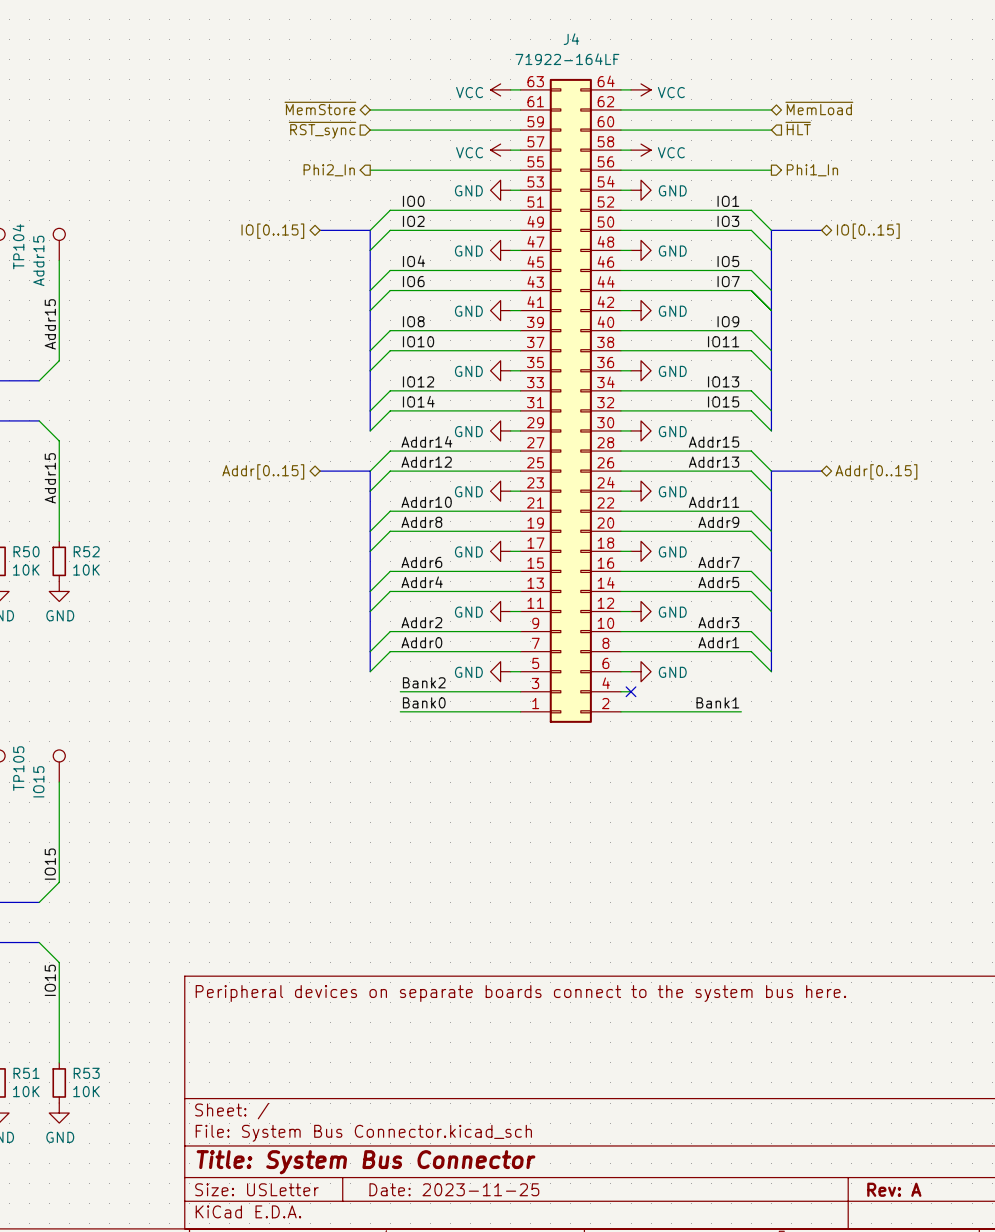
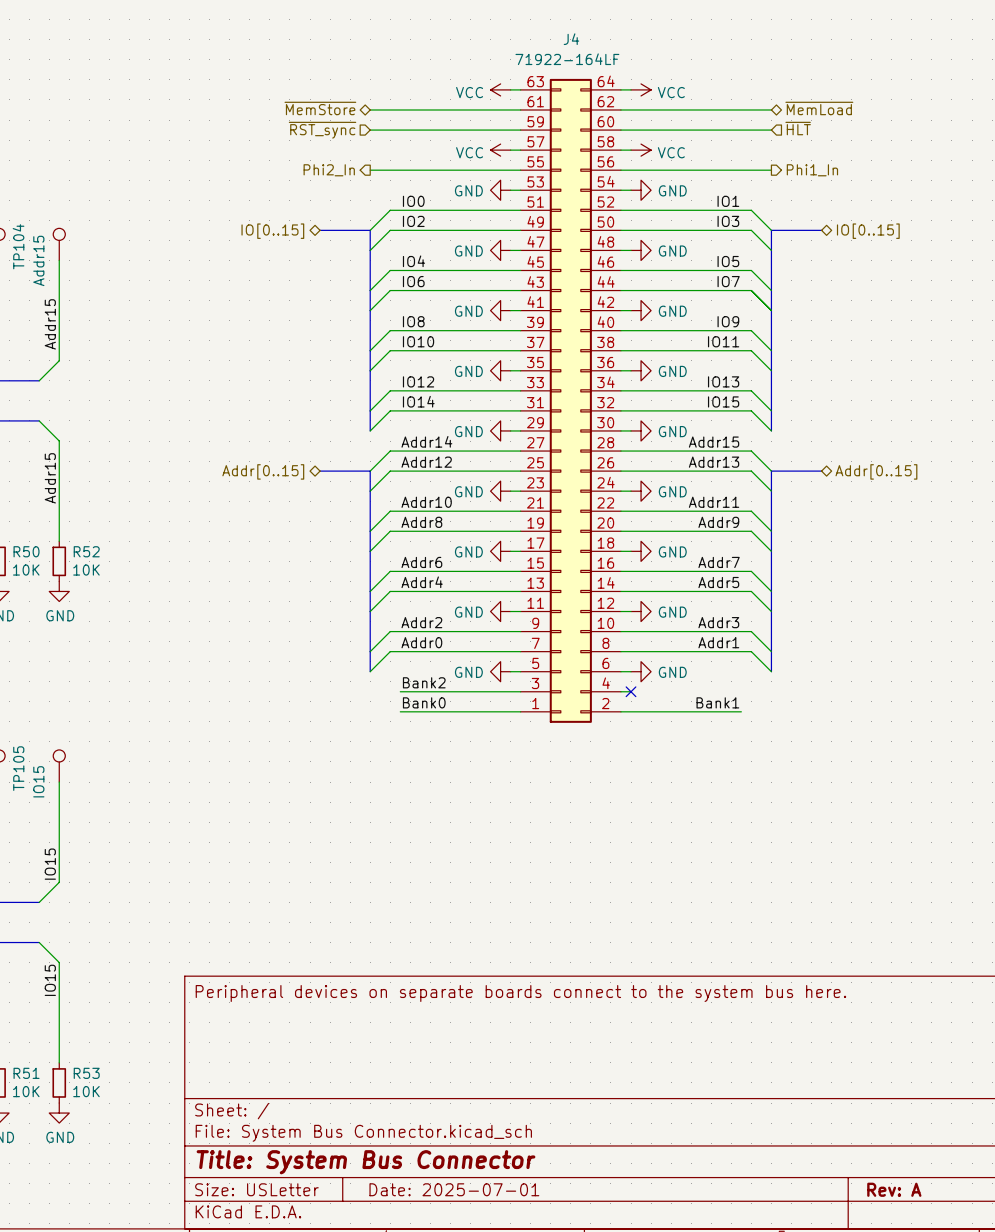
title block: Date: 2023-11-25 (454, 1189) -> Date: 2025-07-01 (454, 1189)

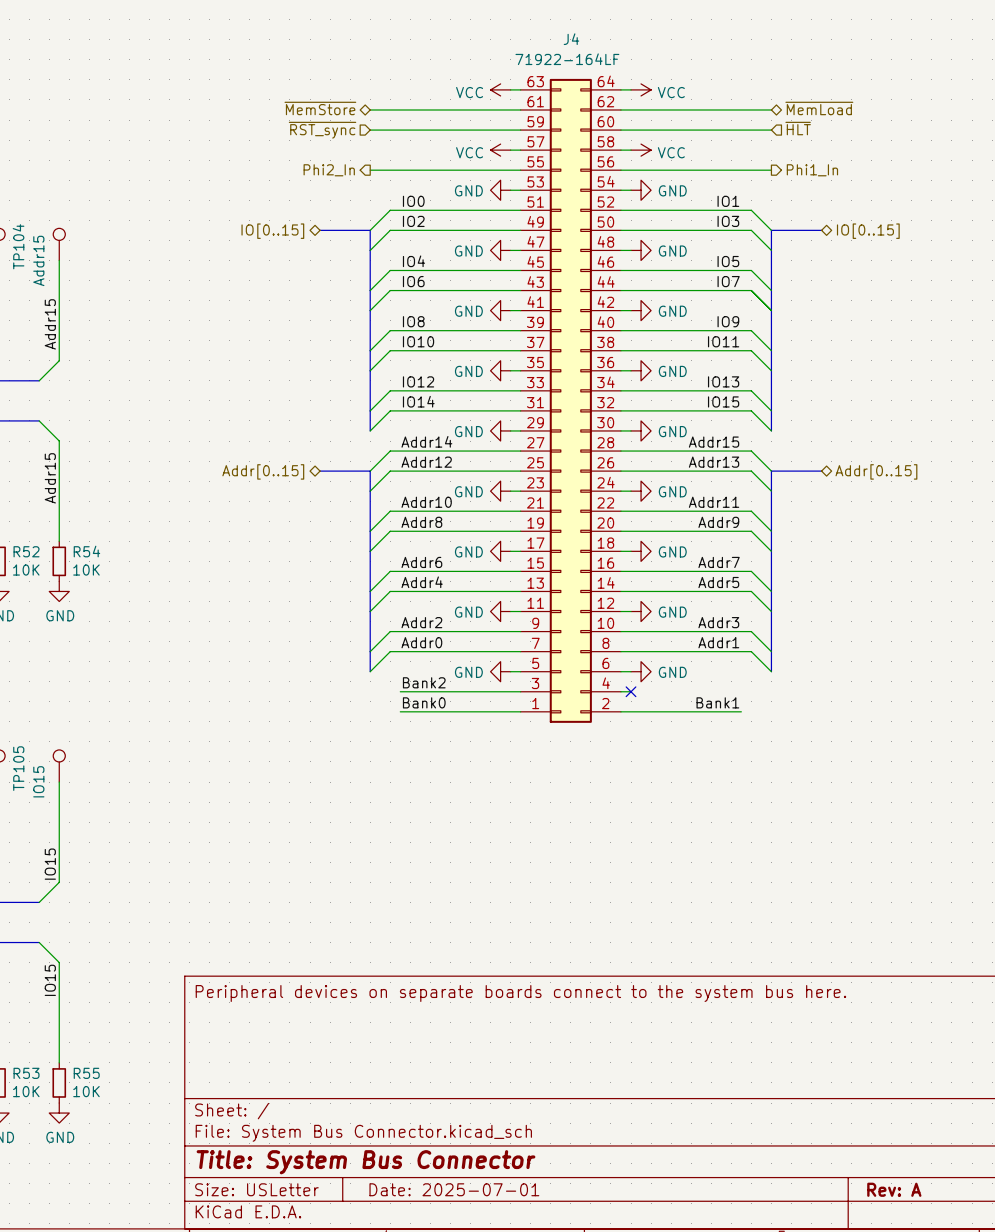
R50 name: R50 (26, 551) -> R52 (26, 551)
R52 name: R52 (86, 551) -> R54 (86, 551)
R51 name: R51 (26, 1073) -> R53 (26, 1073)
R53 name: R53 (86, 1073) -> R55 (86, 1073)

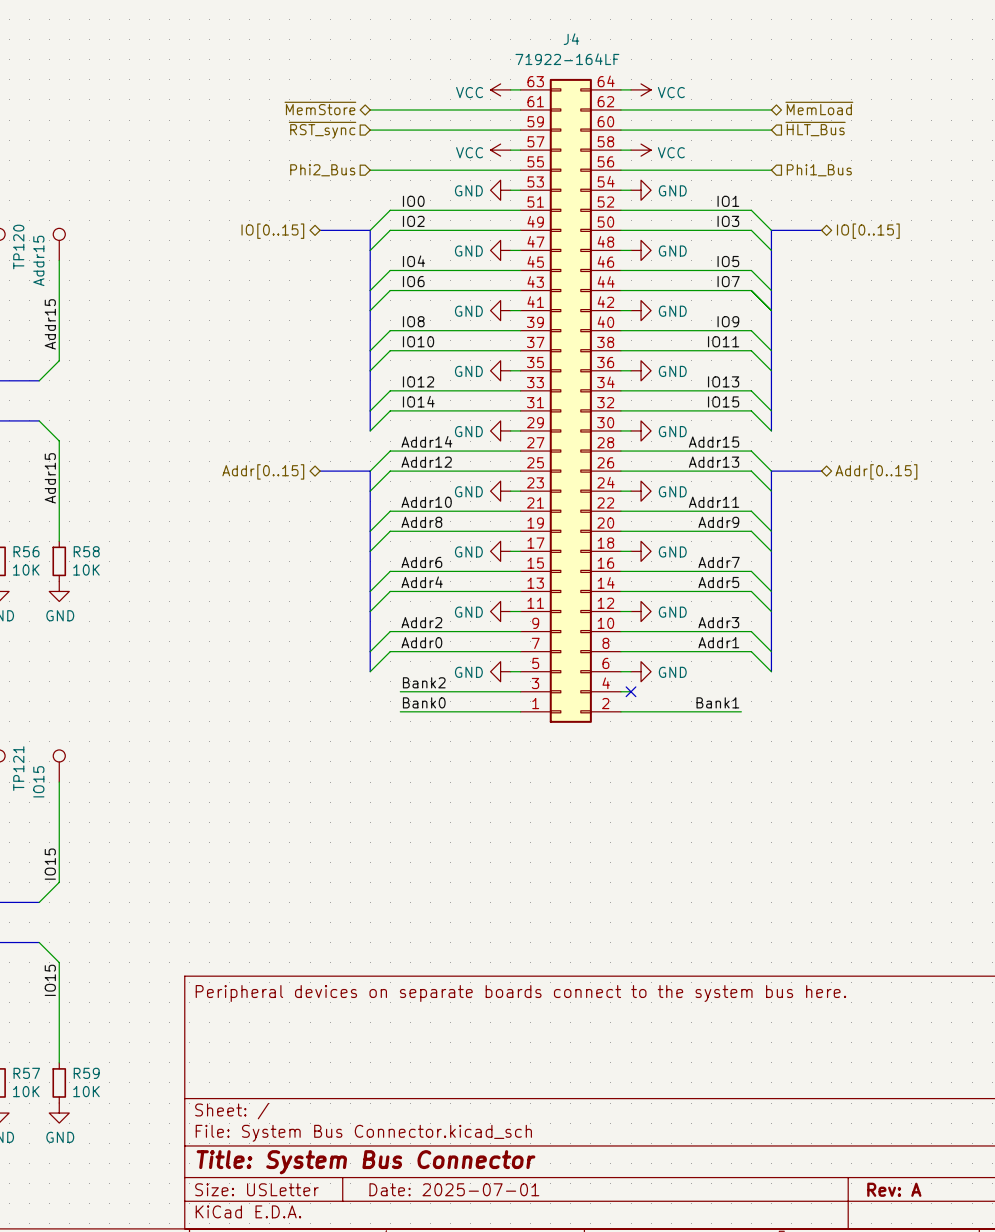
hierarchical label: ~{HLT} (798, 128) -> ~{HLT_Bus} (815, 129)
hierarchical label shape: output (329, 170) -> input (322, 170)
hierarchical label: Phi2_In (329, 170) -> Phi2_Bus (322, 170)
hierarchical label shape: output (812, 170) -> input (819, 170)
hierarchical label: Phi1_In (812, 170) -> Phi1_Bus (819, 170)
TP104 name: TP104 (18, 246) -> TP120 (18, 247)
R52 name: R52 (26, 551) -> R56 (26, 551)
R54 name: R54 (86, 551) -> R58 (86, 551)
TP105 name: TP105 (18, 768) -> TP121 (18, 768)
R53 name: R53 (26, 1073) -> R57 (26, 1073)
R55 name: R55 (86, 1073) -> R59 (86, 1073)

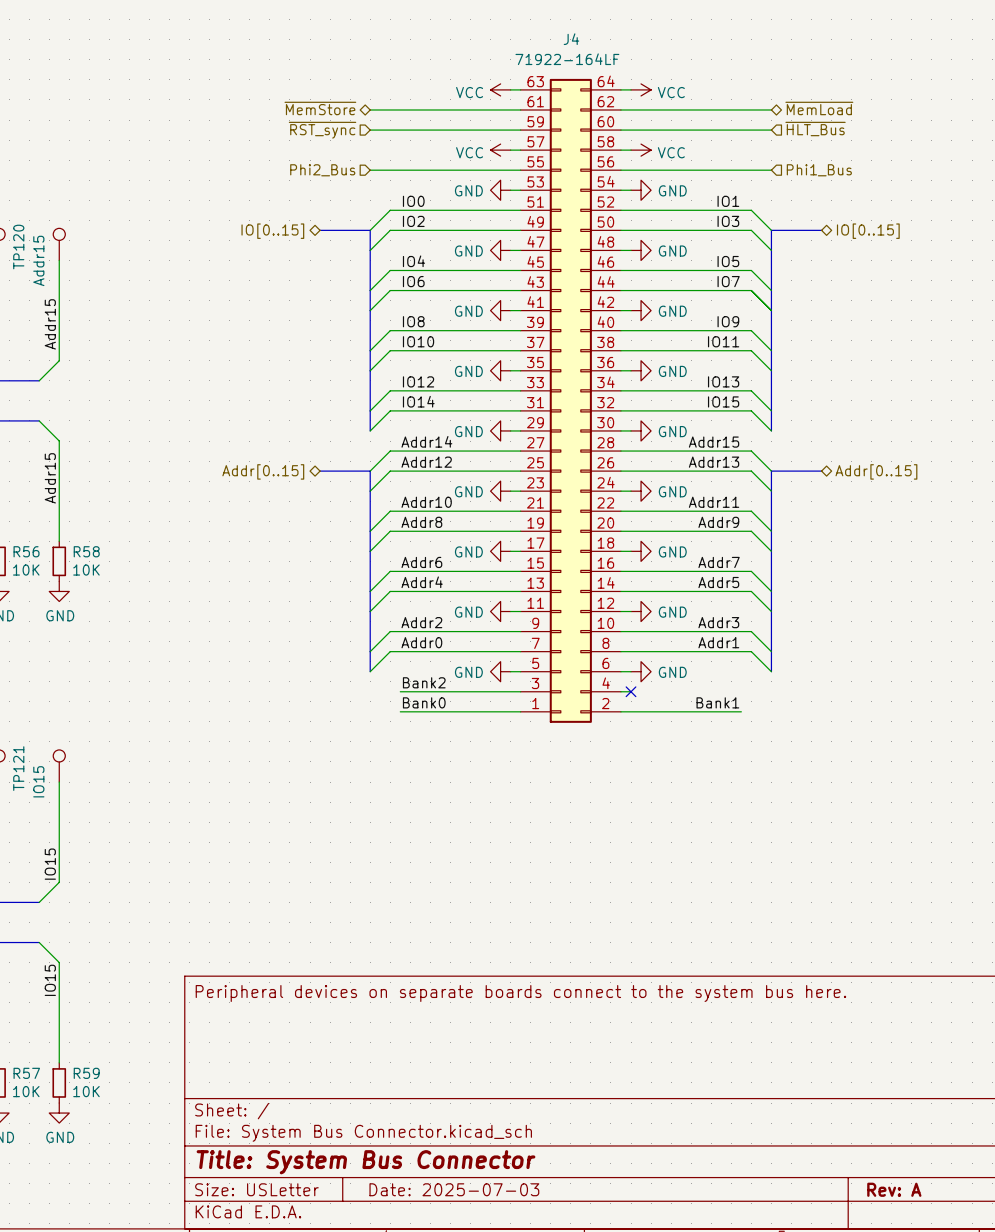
title block: Date: 2025-07-01 (454, 1189) -> Date: 2025-07-03 (454, 1189)

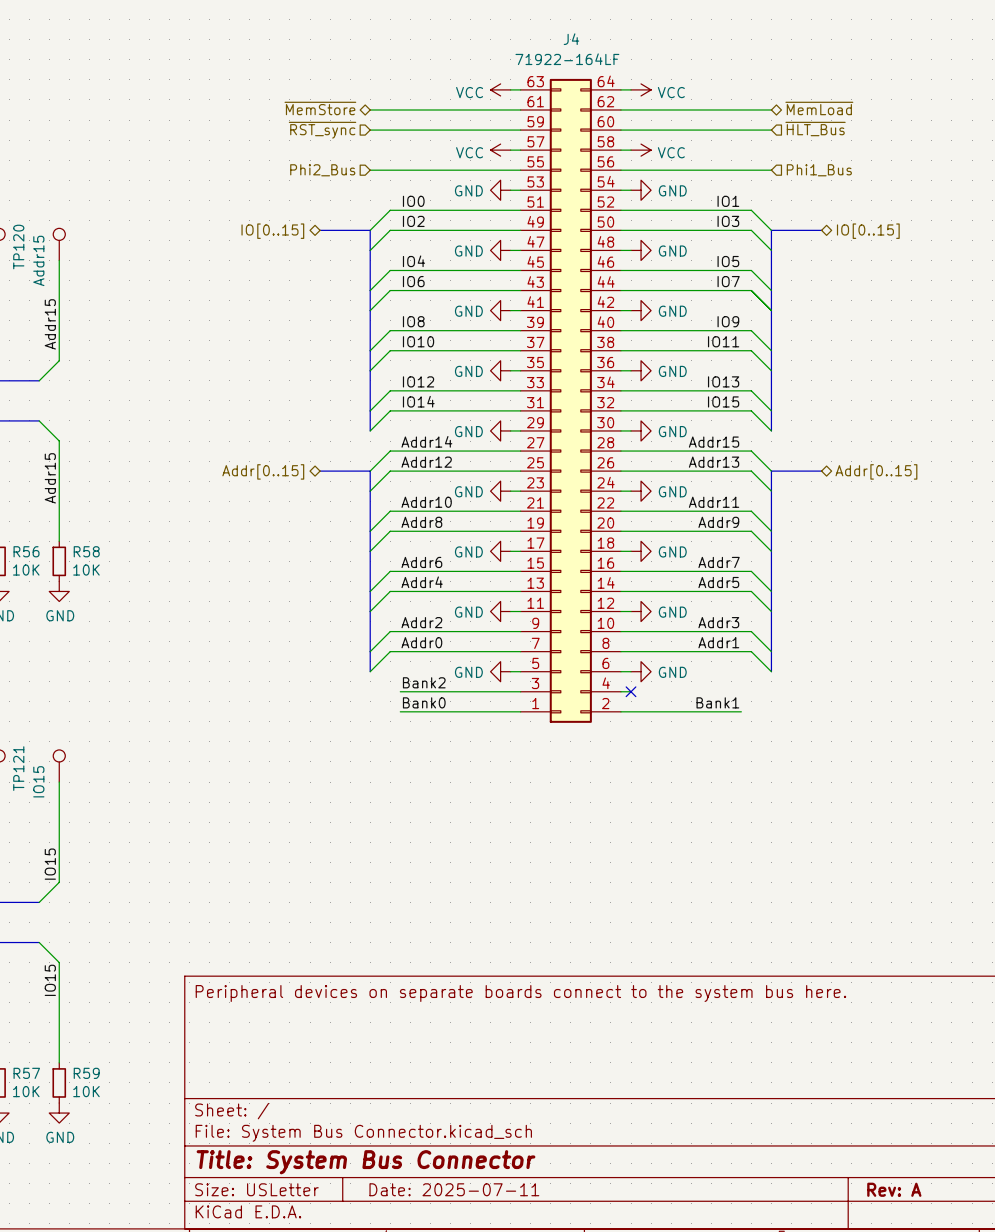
title block: Date: 2025-07-03 (454, 1189) -> Date: 2025-07-11 (454, 1189)

